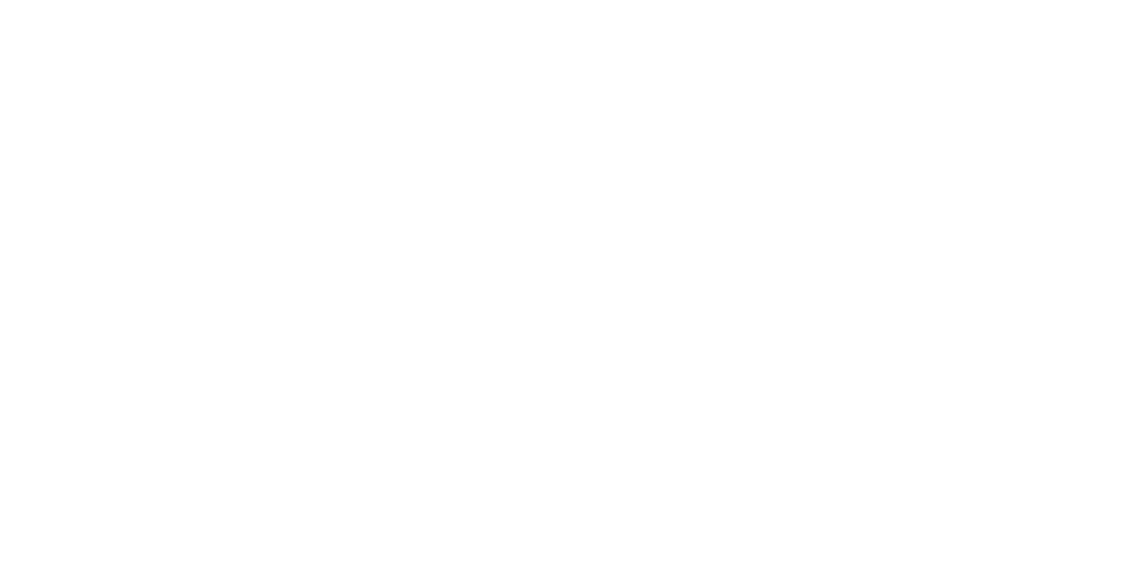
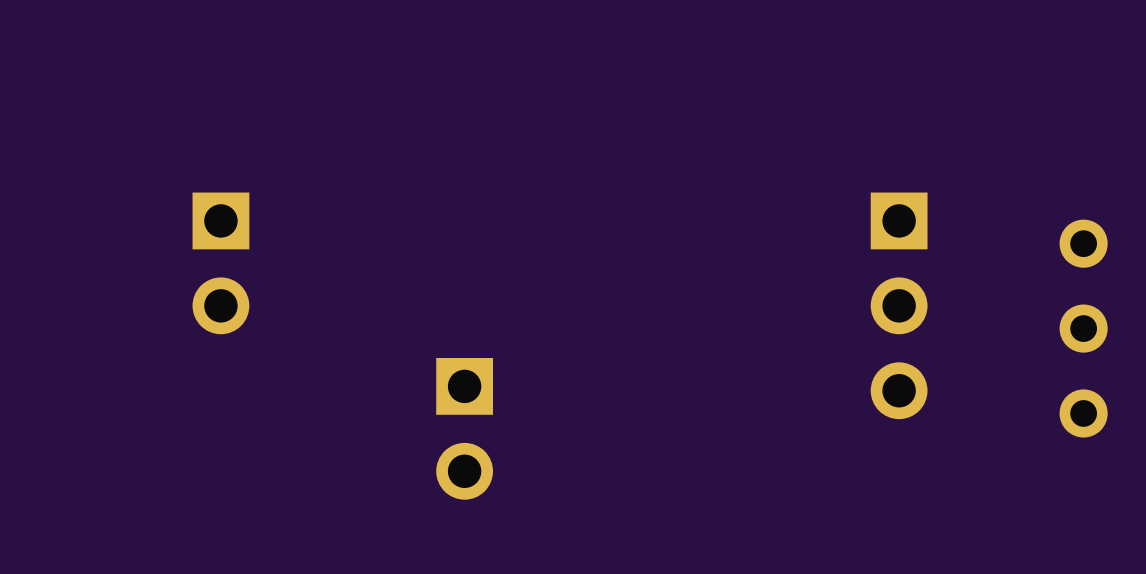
part: none -> (220, 263)
part: none -> (899, 305)
part: none -> (1083, 328)
part: none -> (464, 428)

